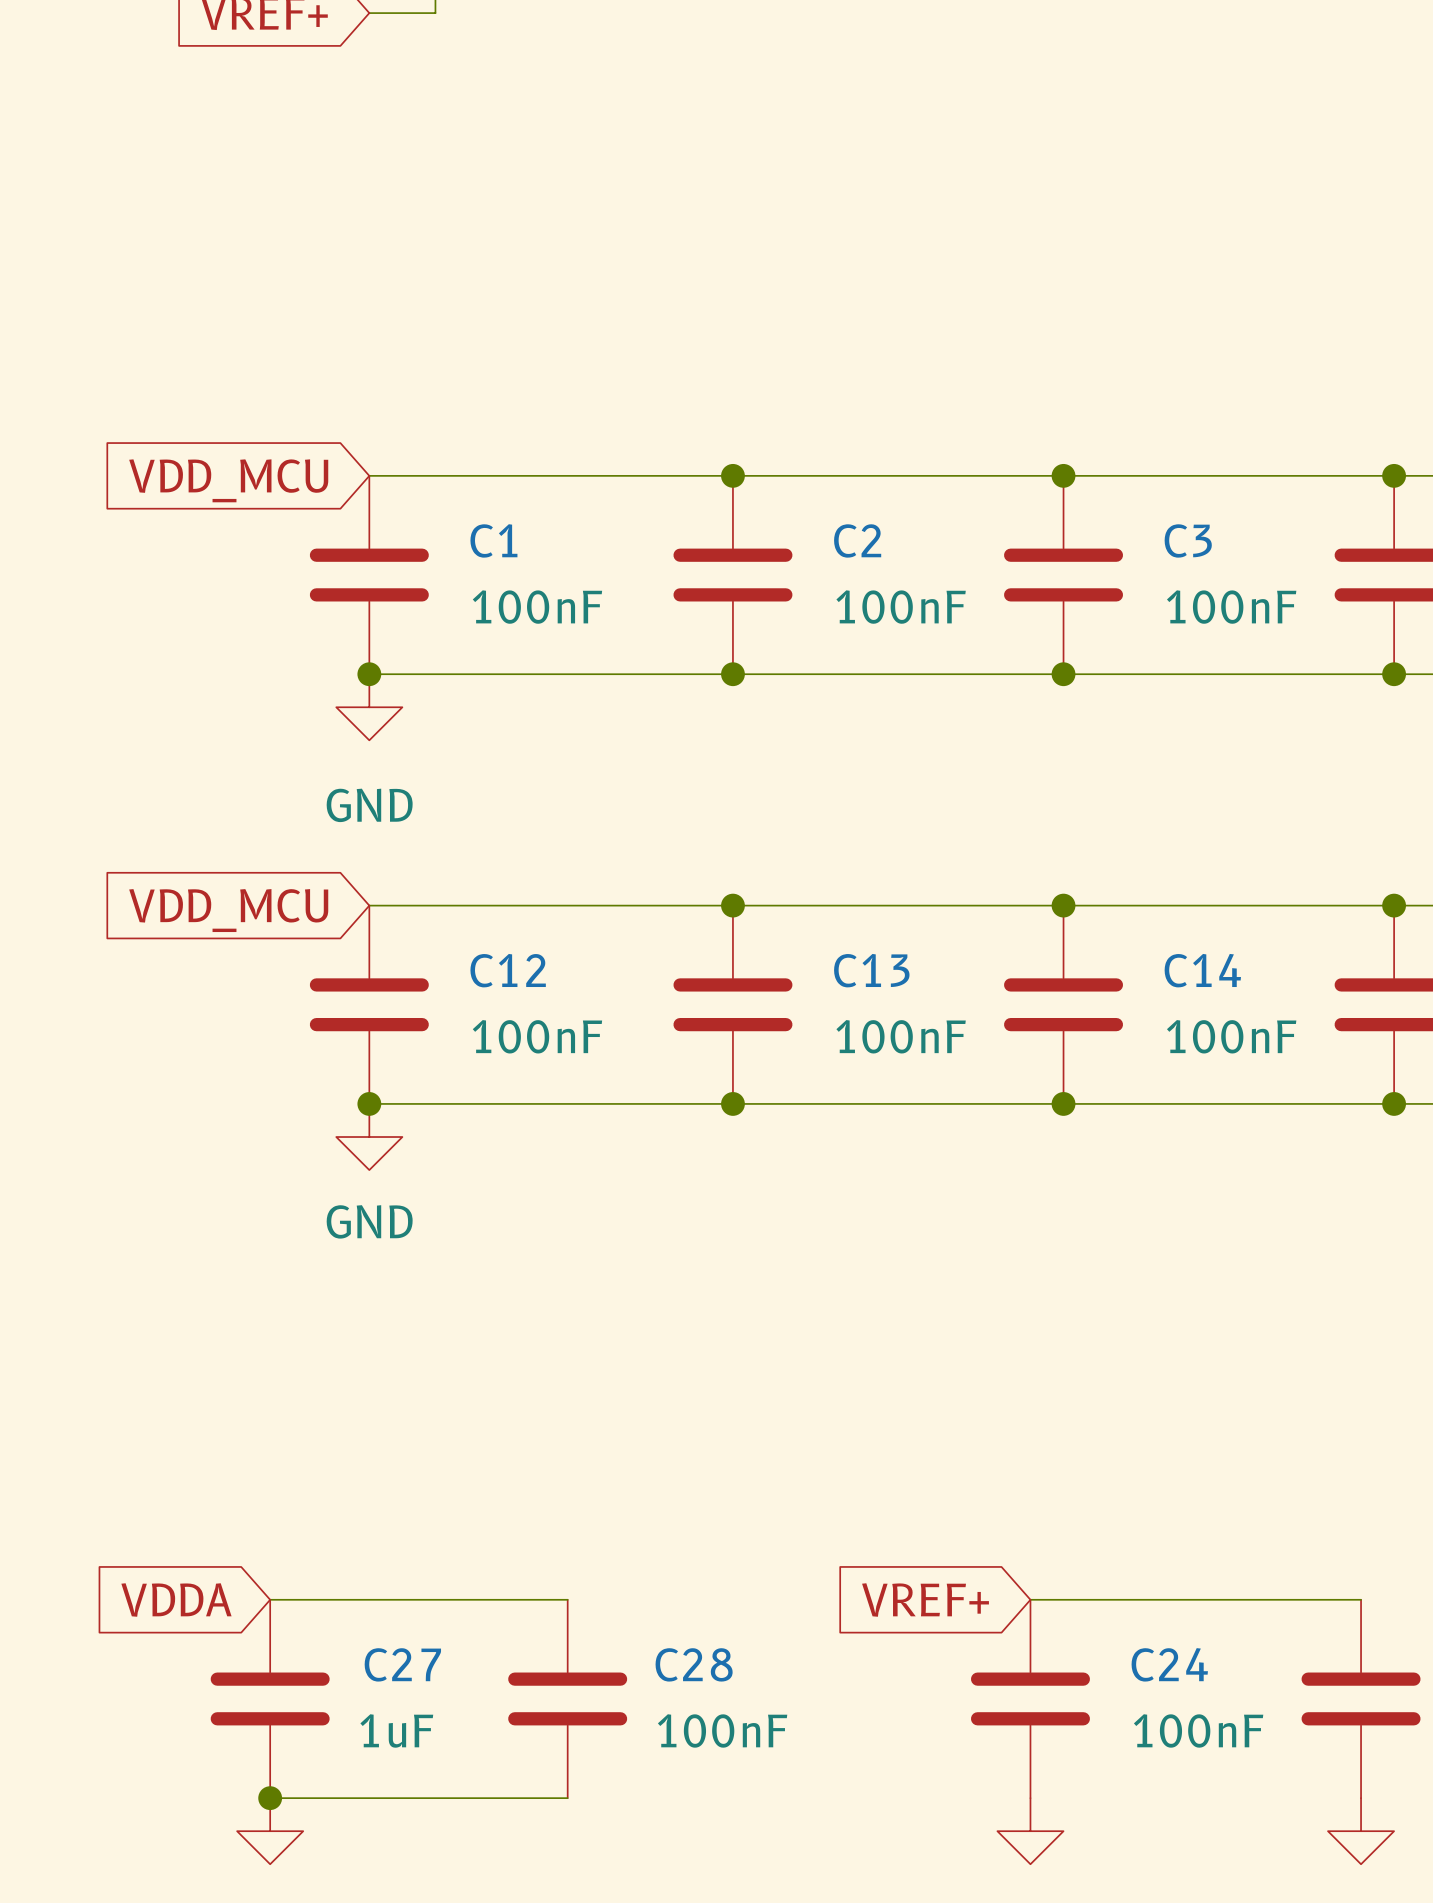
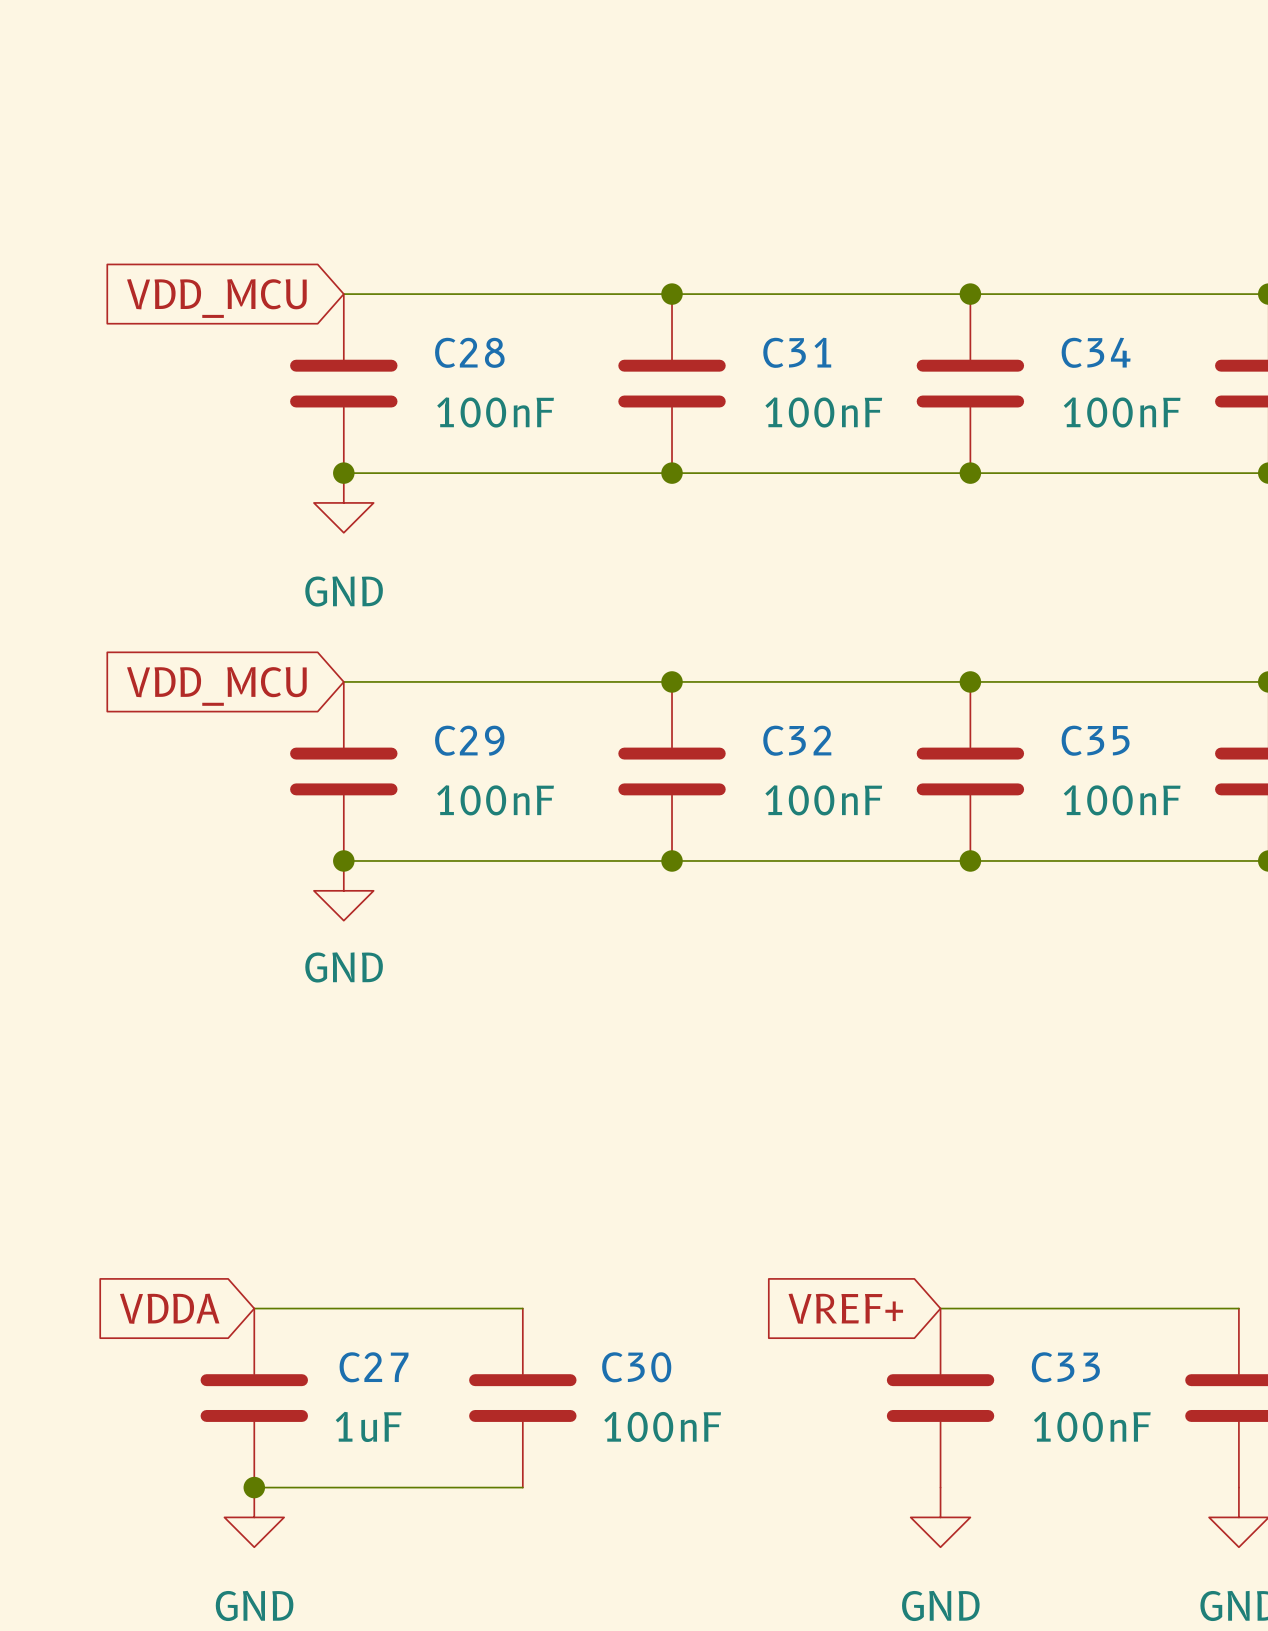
C1 name: C1 (493, 540) -> C28 (469, 352)
C2 name: C2 (857, 540) -> C31 (797, 352)
C3 name: C3 (1188, 540) -> C34 (1096, 352)
C12 name: C12 (508, 970) -> C29 (469, 740)
C13 name: C13 (871, 970) -> C32 (797, 740)
C14 name: C14 (1202, 970) -> C35 (1095, 740)
C28 name: C28 (694, 1664) -> C30 (636, 1367)
C24 name: C24 (1169, 1664) -> C33 (1065, 1367)

